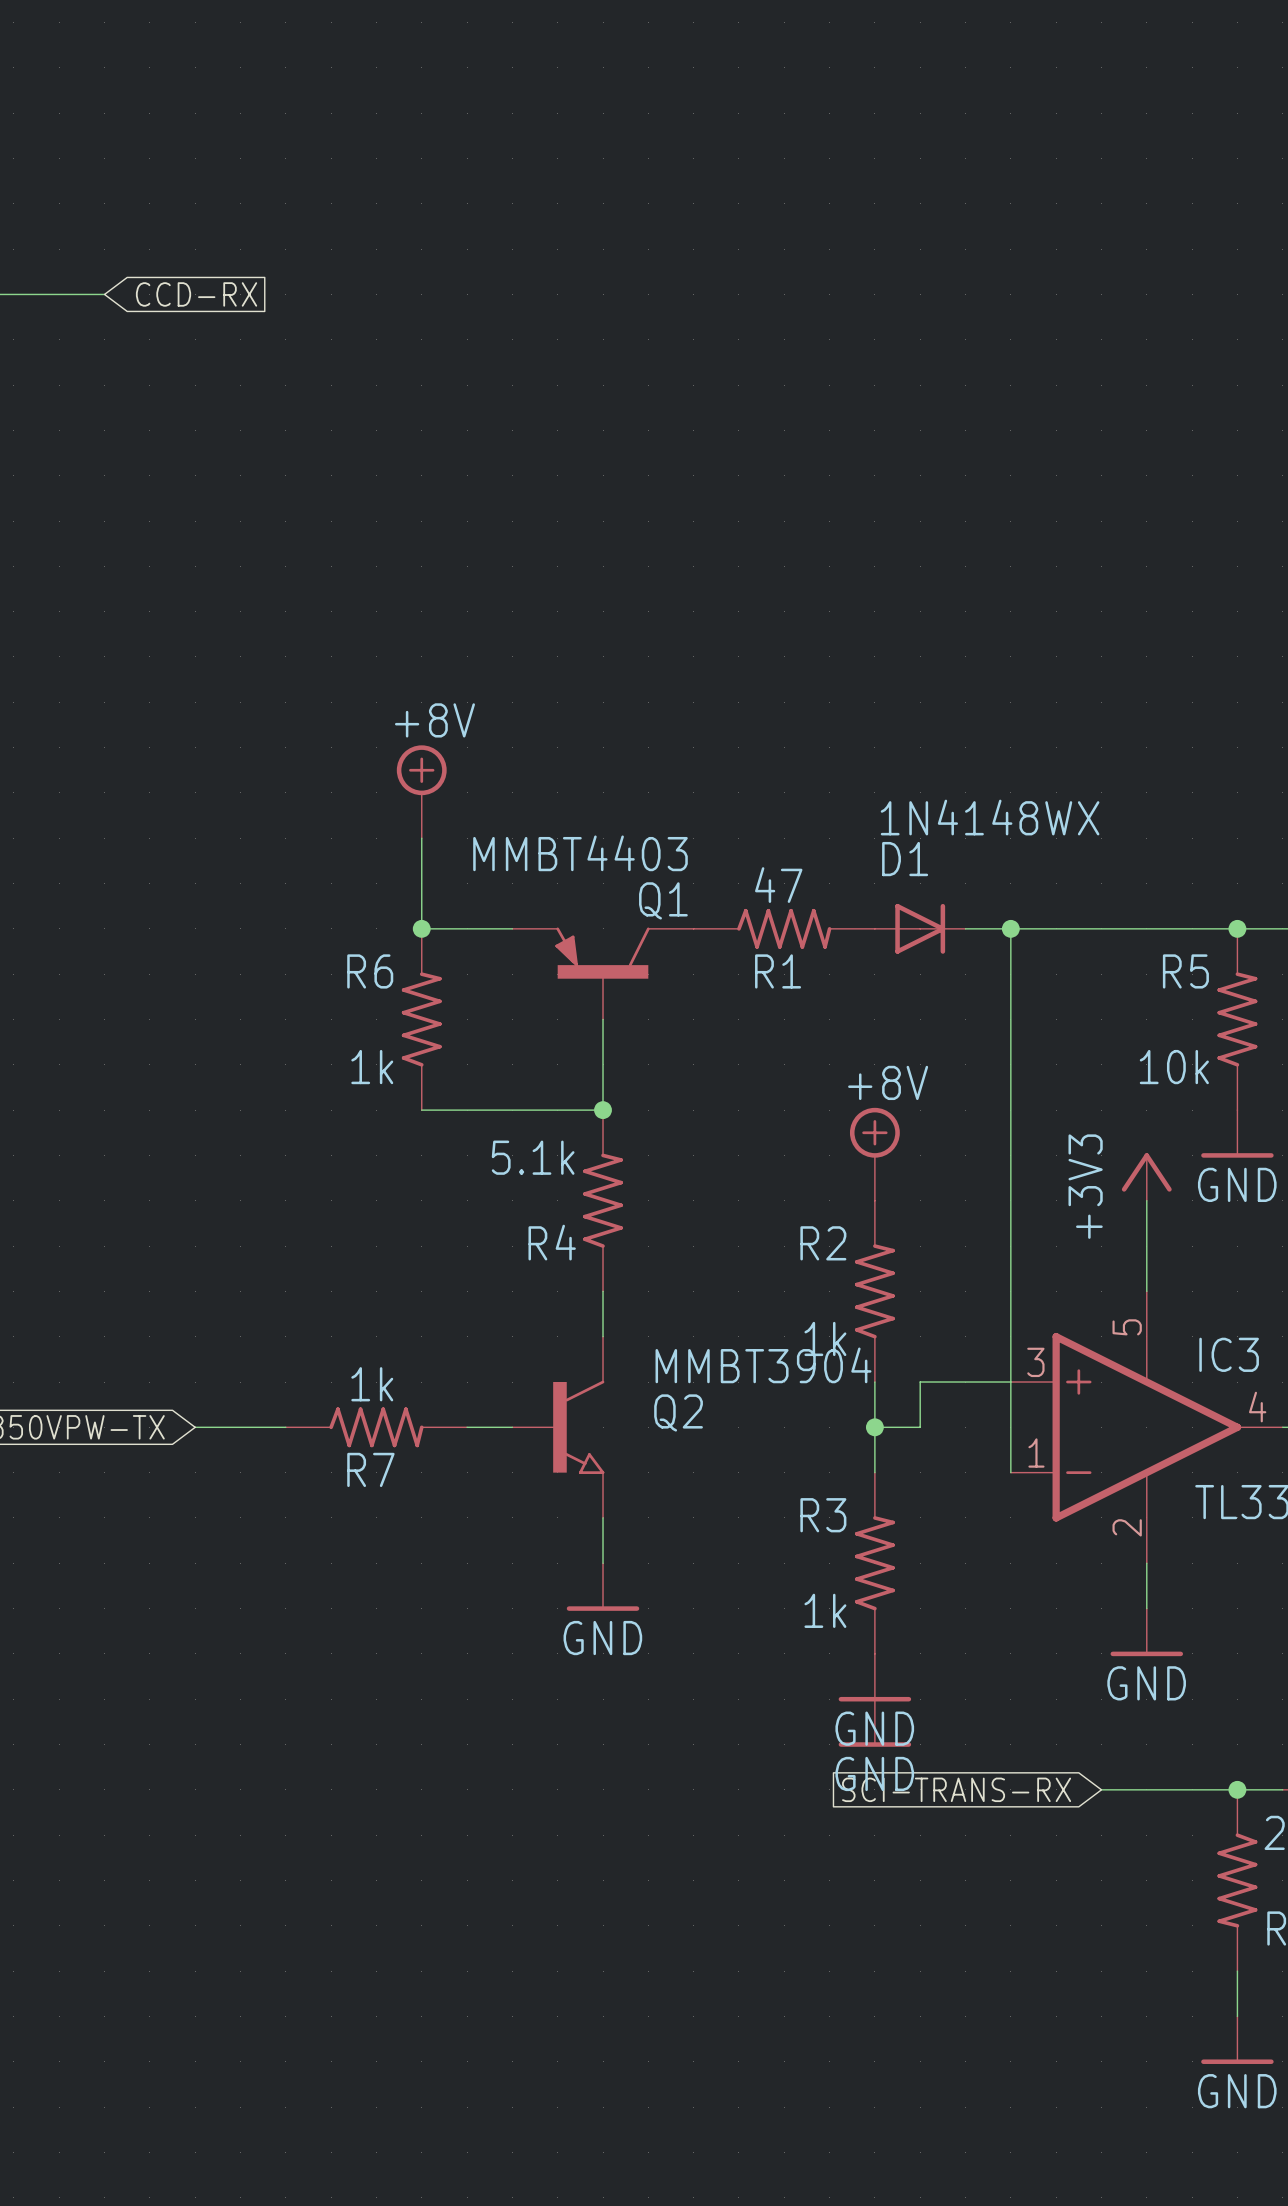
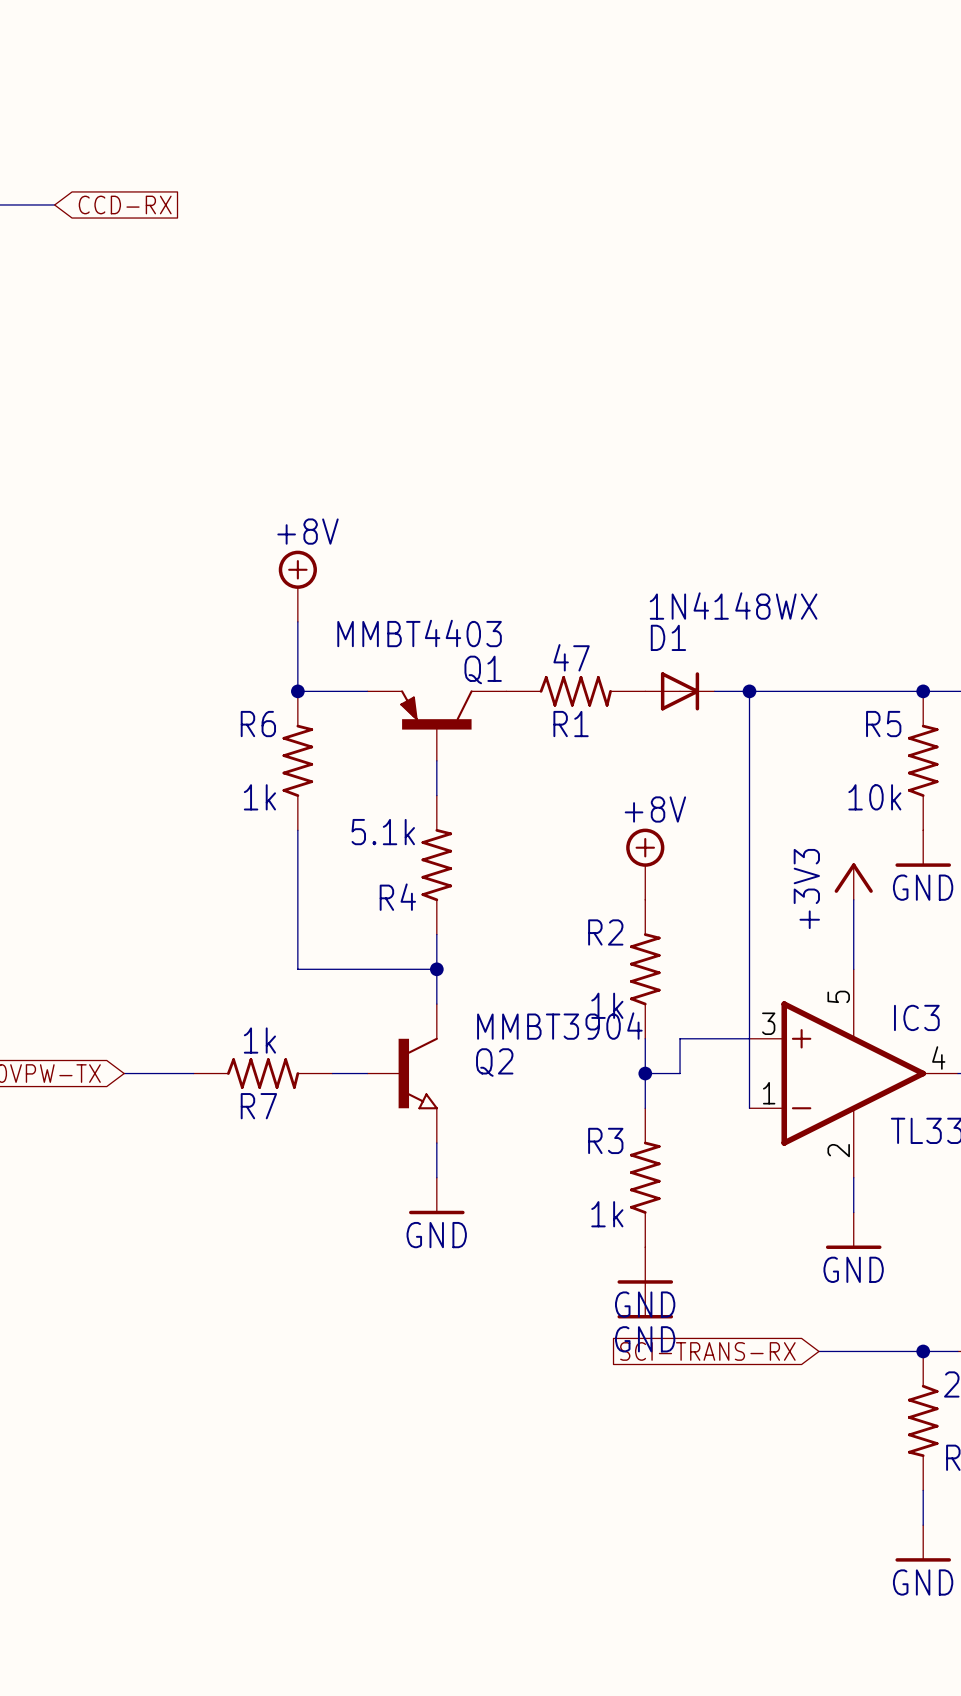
wire: (603, 1064) (603, 1110) (421, 1110) -> (436, 934) (436, 969) (297, 969) (297, 830)
junction: (603, 1110) -> none
R4 position: (603, 1200) -> (436, 865)
junction: none -> (436, 969)

